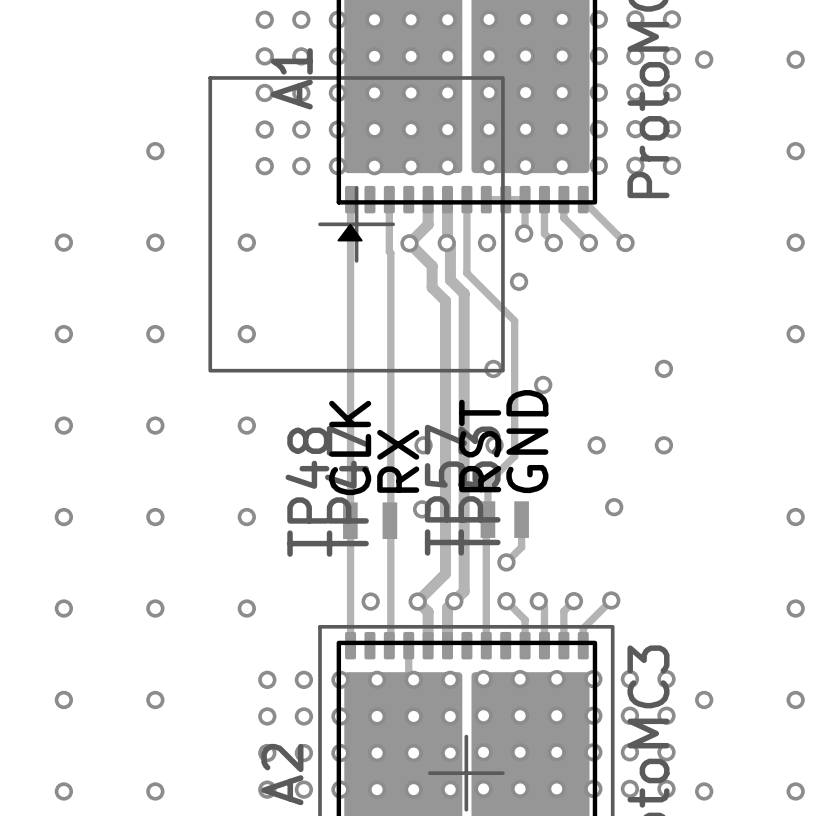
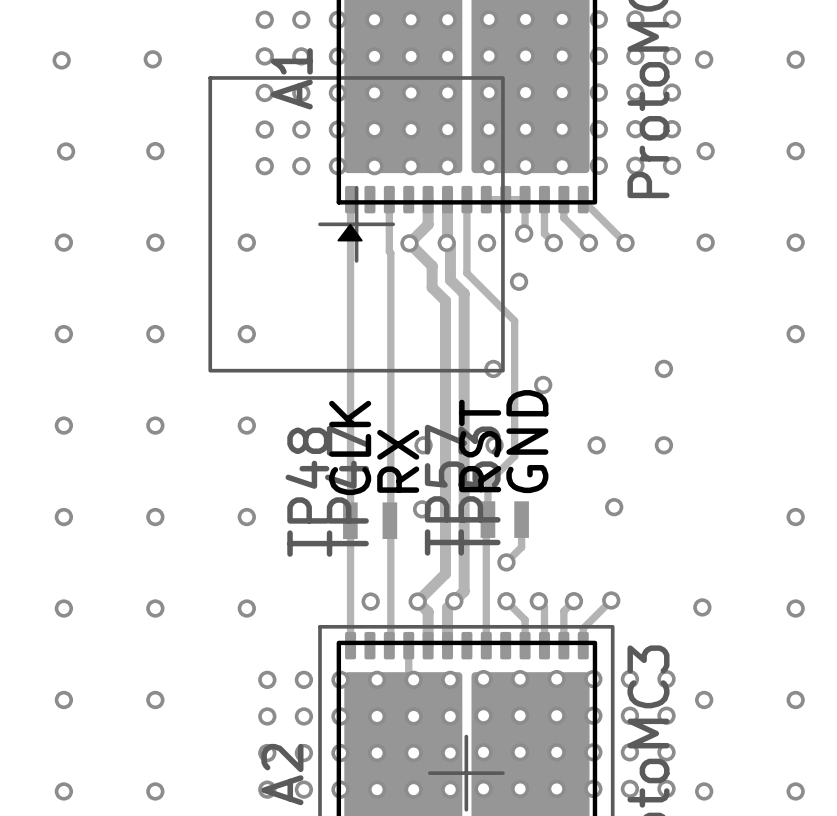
via: none -> (152, 59)
via: none -> (61, 60)
via: none -> (66, 151)
via: none -> (705, 151)
via: none -> (705, 242)
via: none -> (702, 607)

